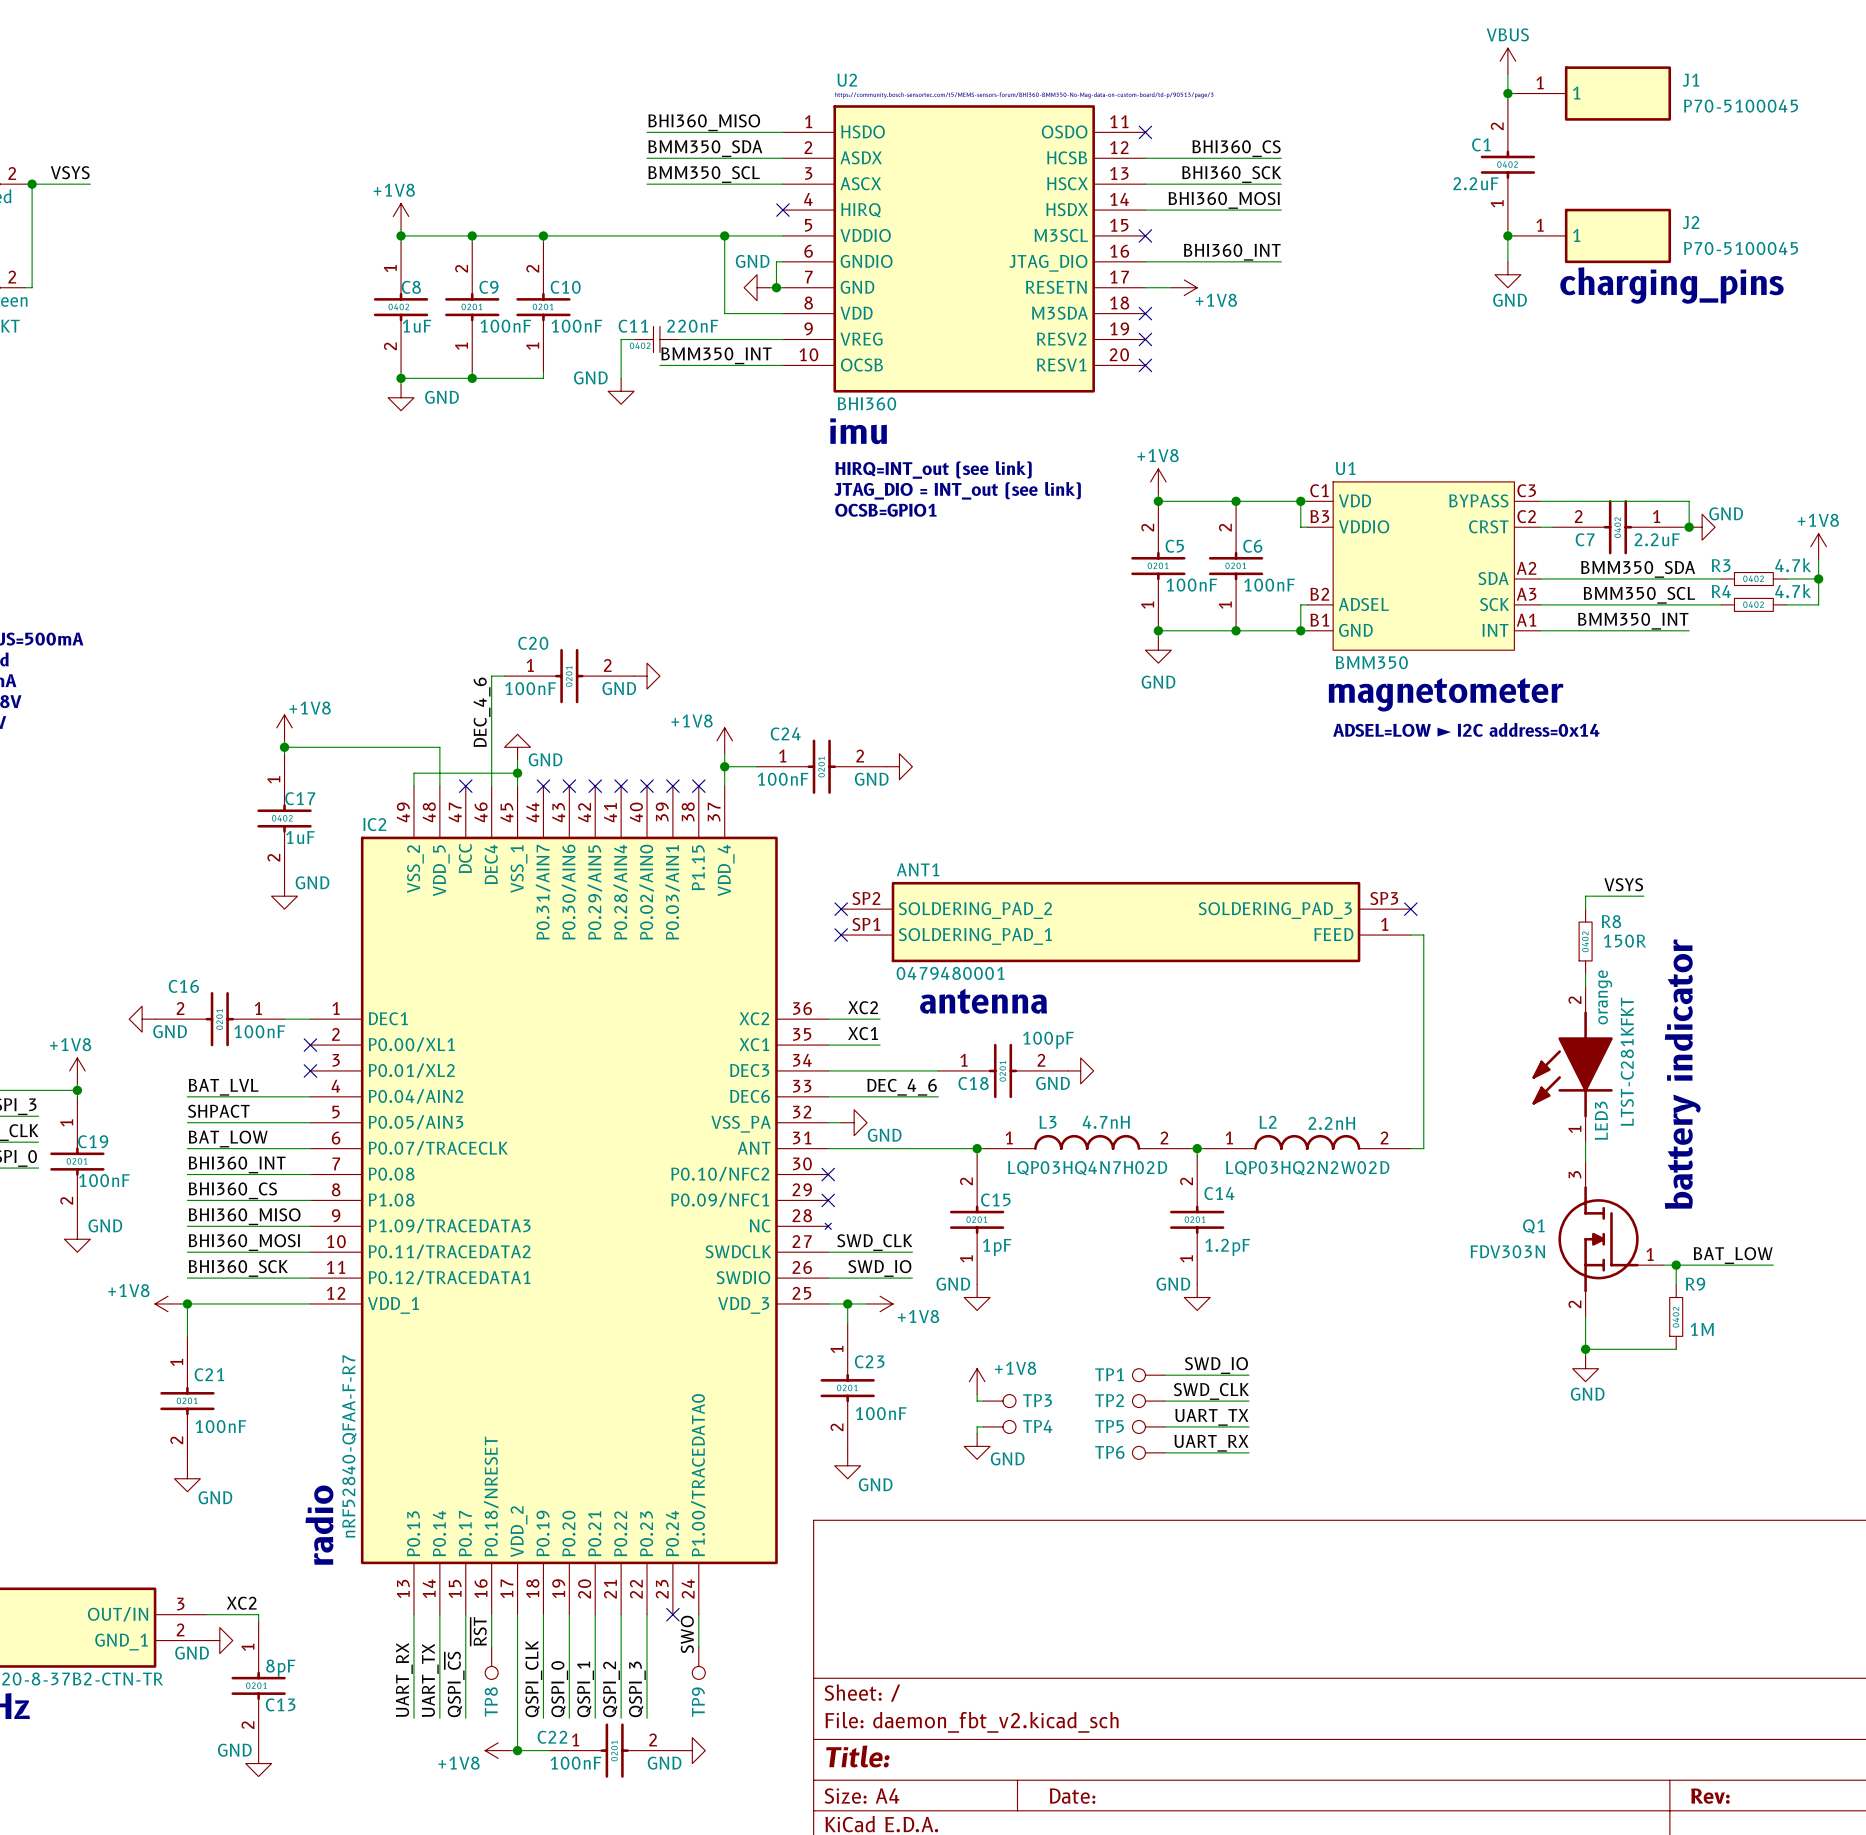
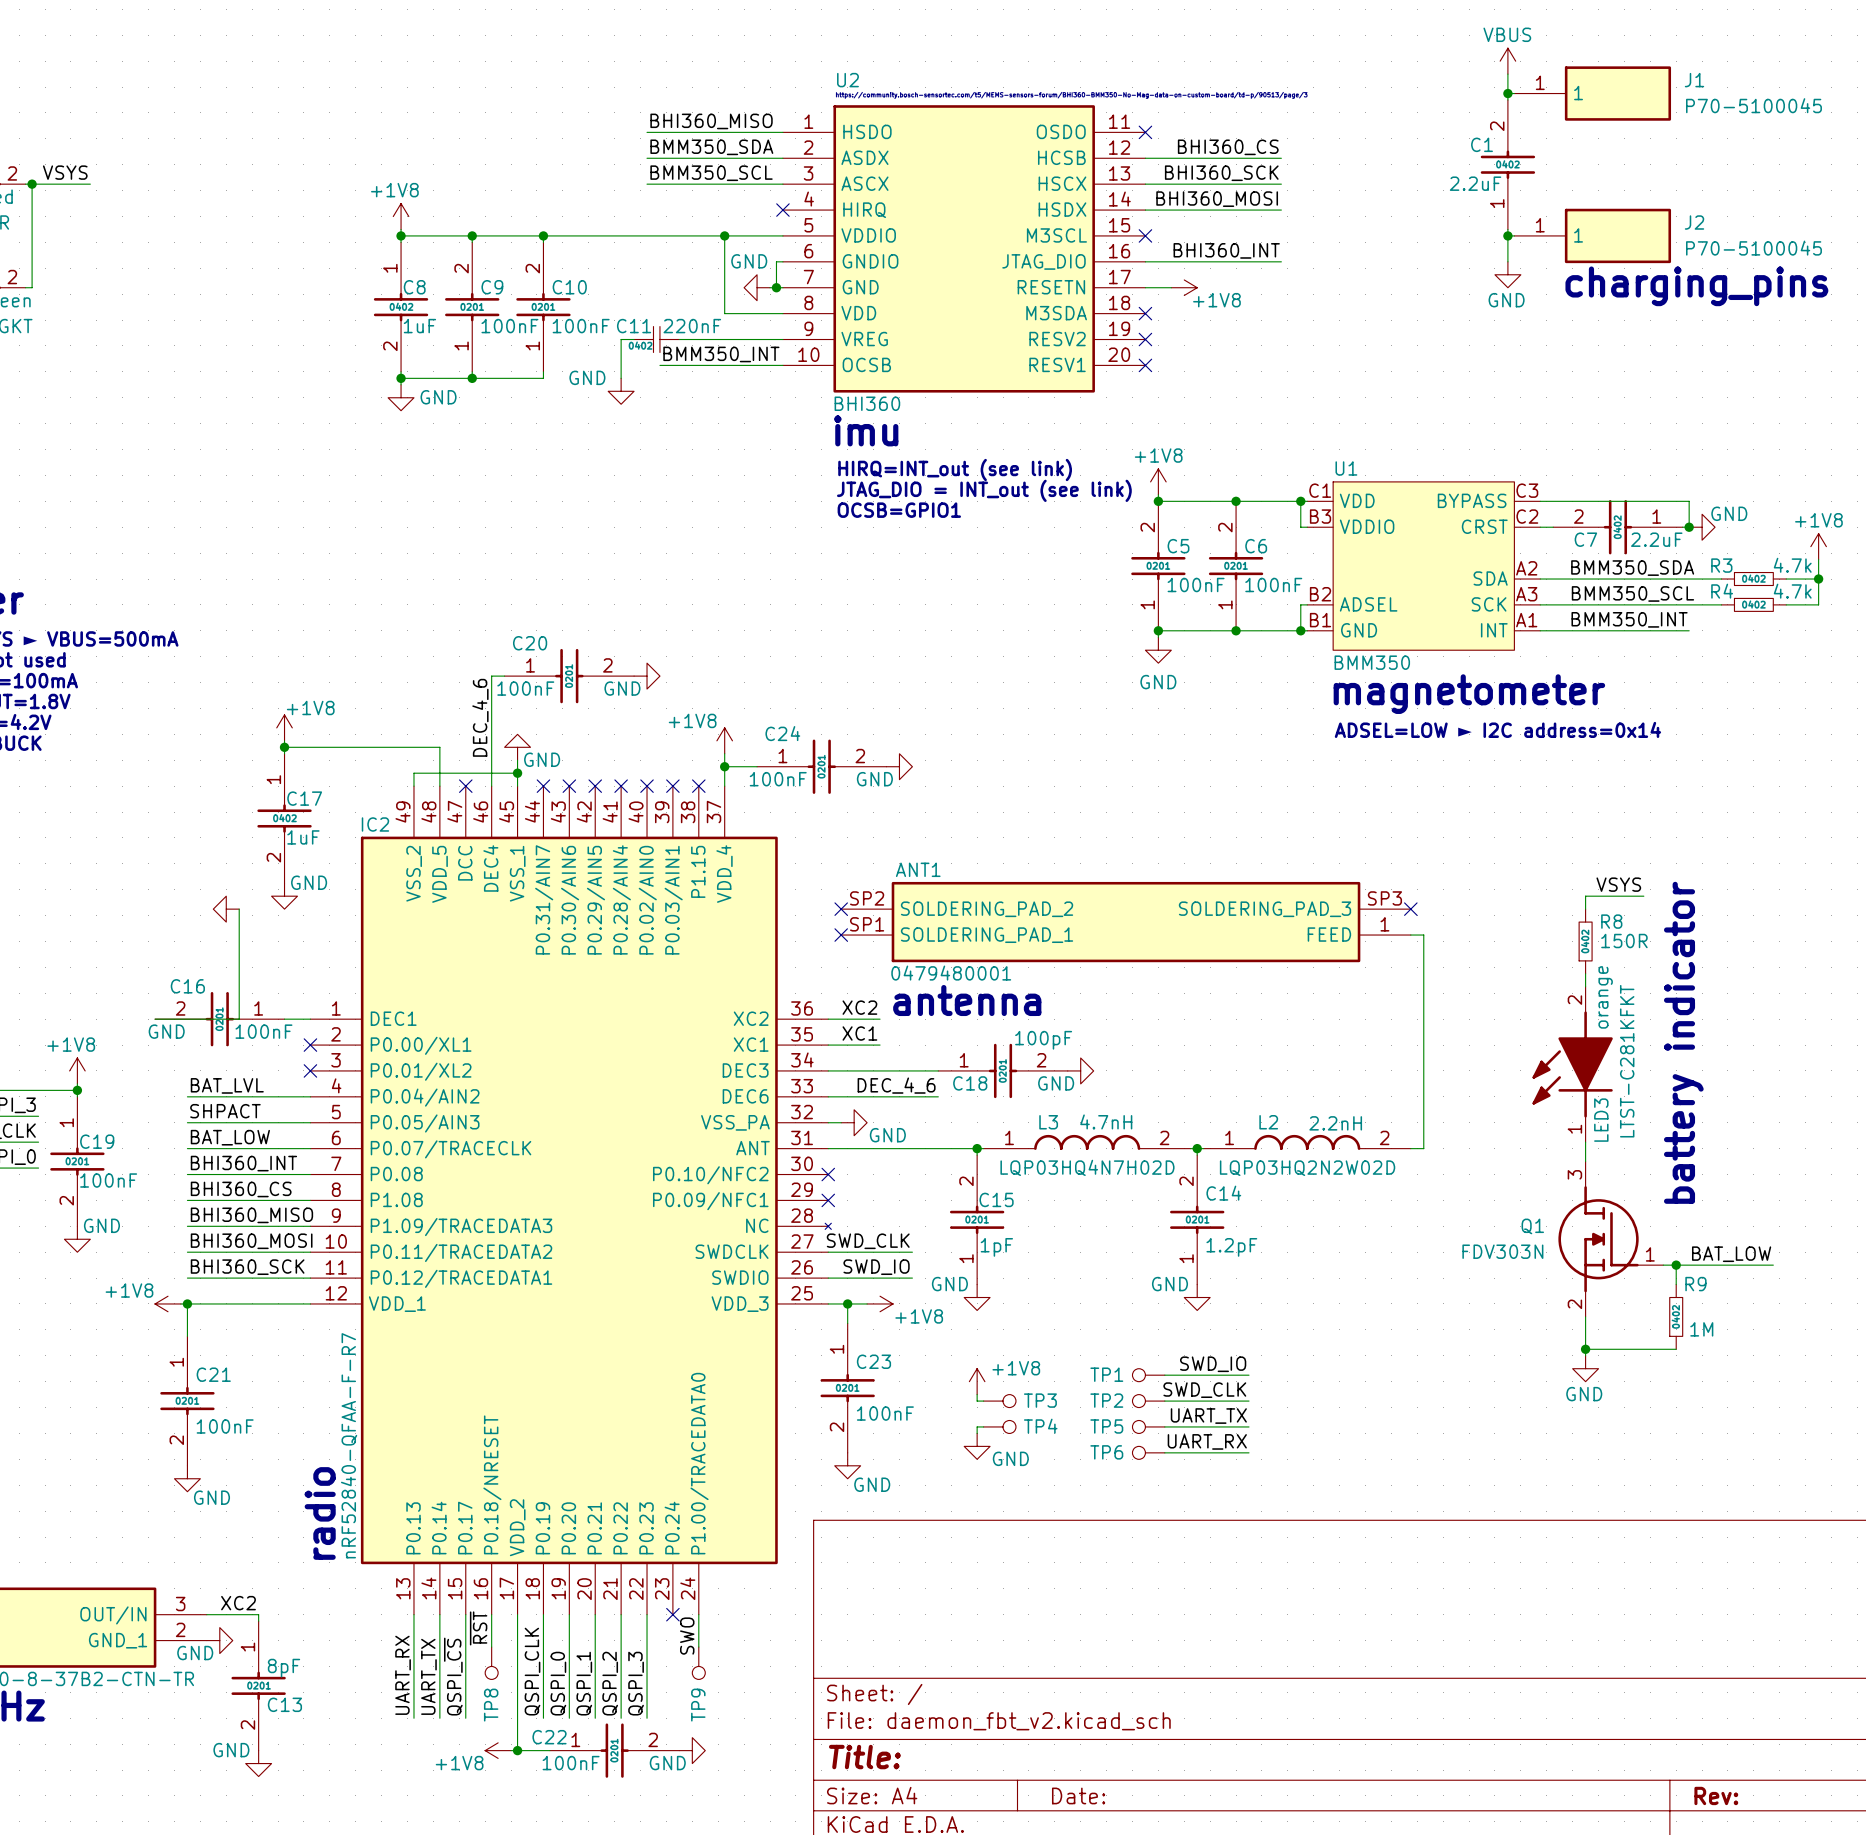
wire: none -> (239, 909) (239, 1019) (155, 1019)
power symbol position: GND (142, 1019) -> GND (226, 909)

